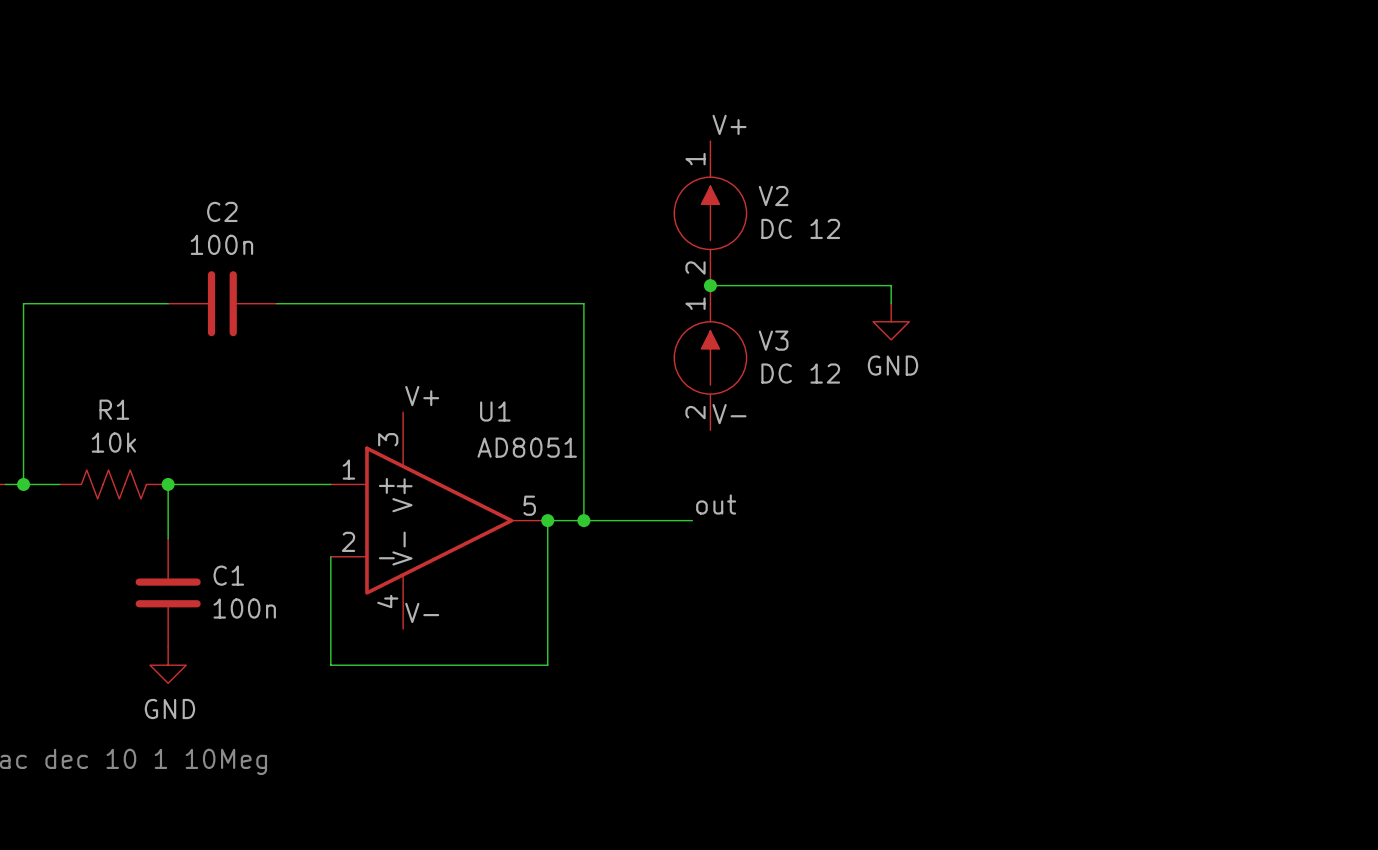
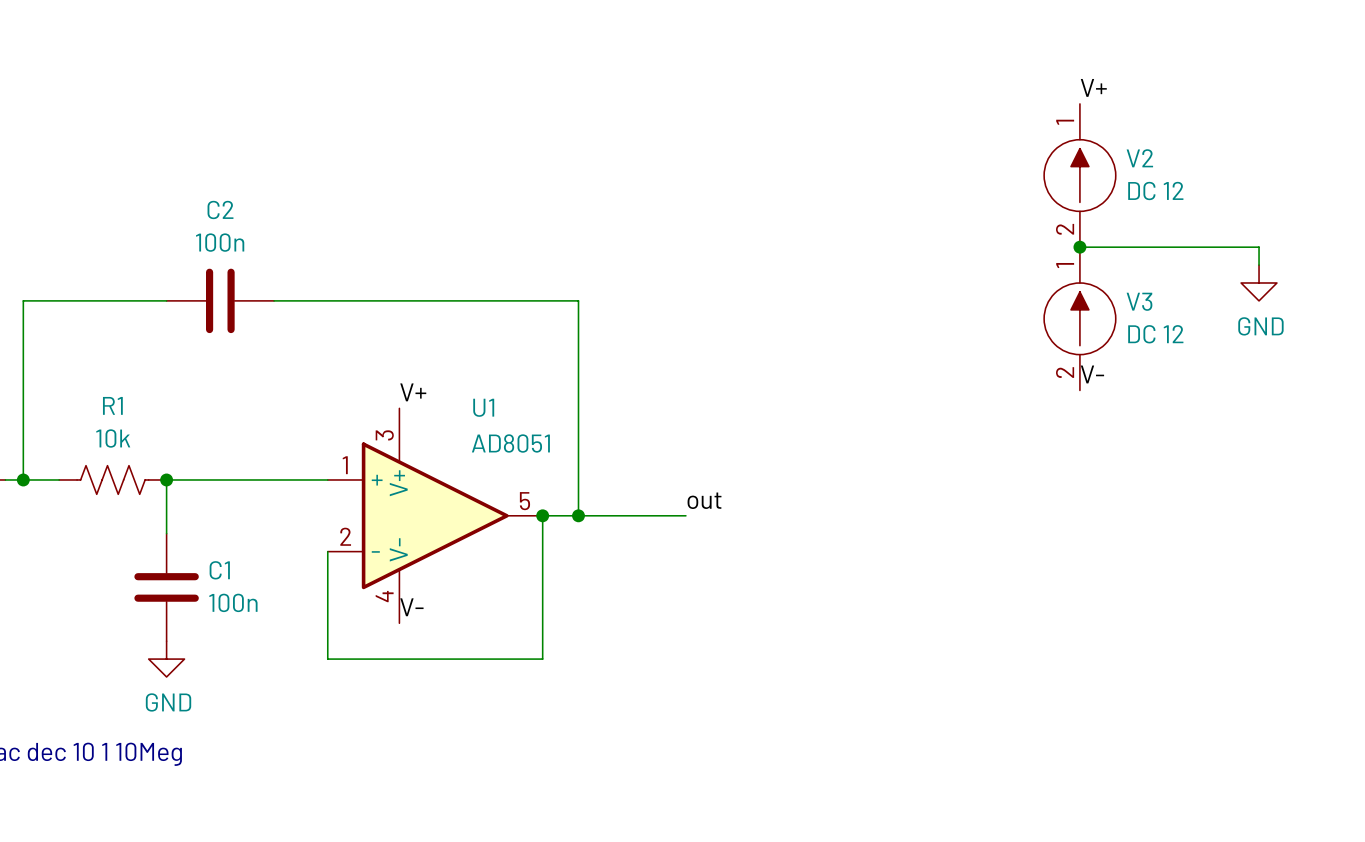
label: none -> V+ (1093, 87)
label: V+ (729, 124) -> none
V2 position: (710, 213) -> (1079, 175)
wire: none -> (1079, 247) (1259, 247) (1259, 265)
junction: none -> (1079, 247)
wire: (710, 285) (891, 285) (891, 303) -> none
junction: (710, 285) -> none
power symbol: none -> GND (1259, 282)
power symbol: GND (891, 321) -> none
V3 position: (710, 357) -> (1079, 318)
label: none -> V- (1092, 374)
label: V- (729, 414) -> none

